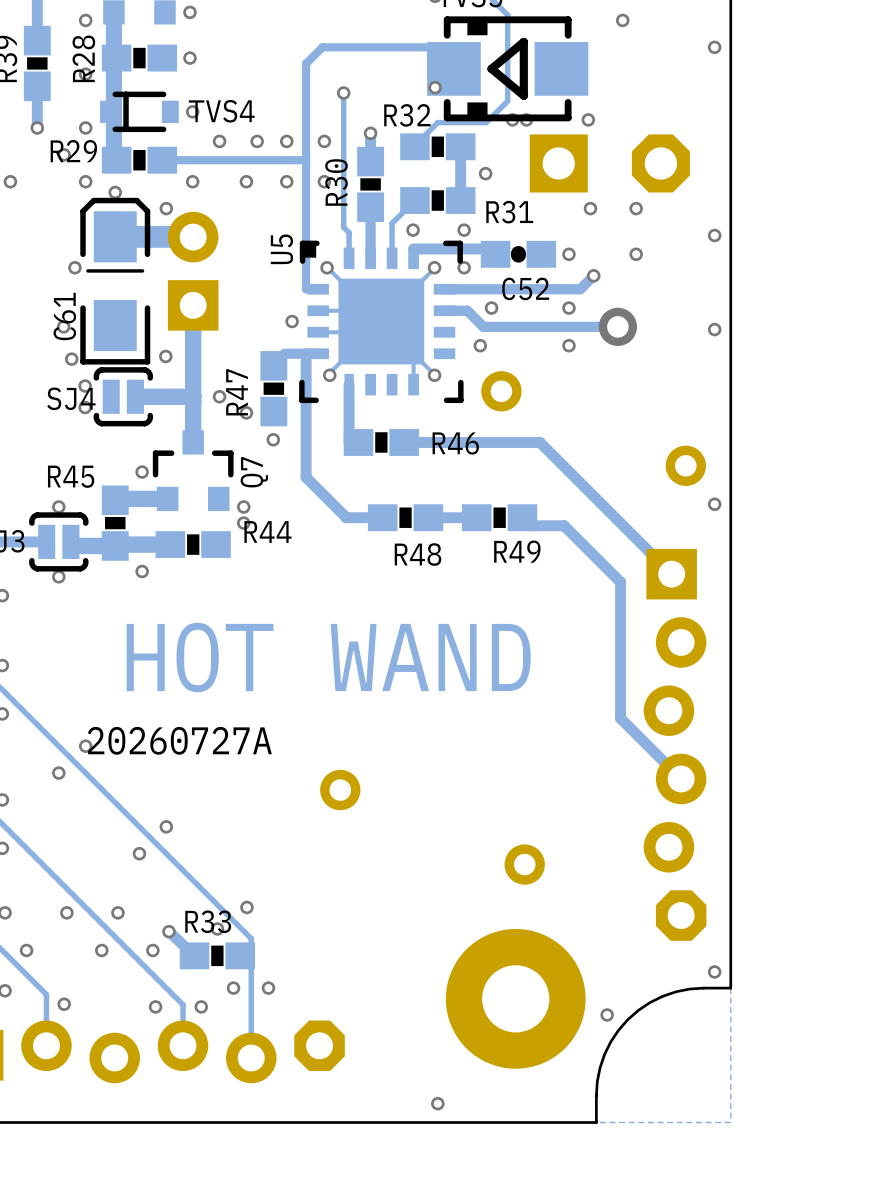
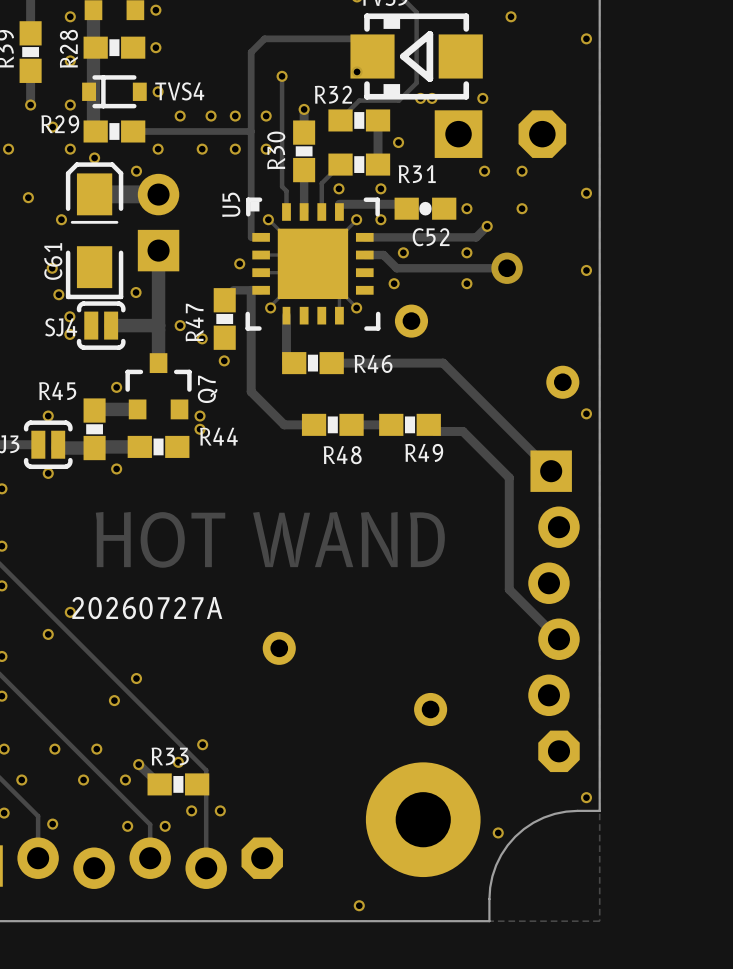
via: none -> (28, 197)

